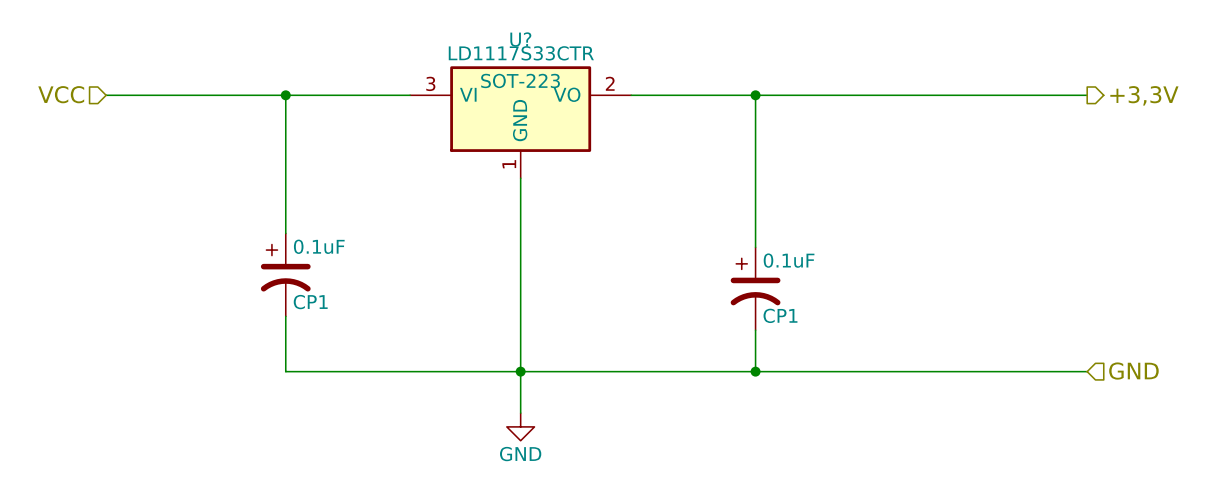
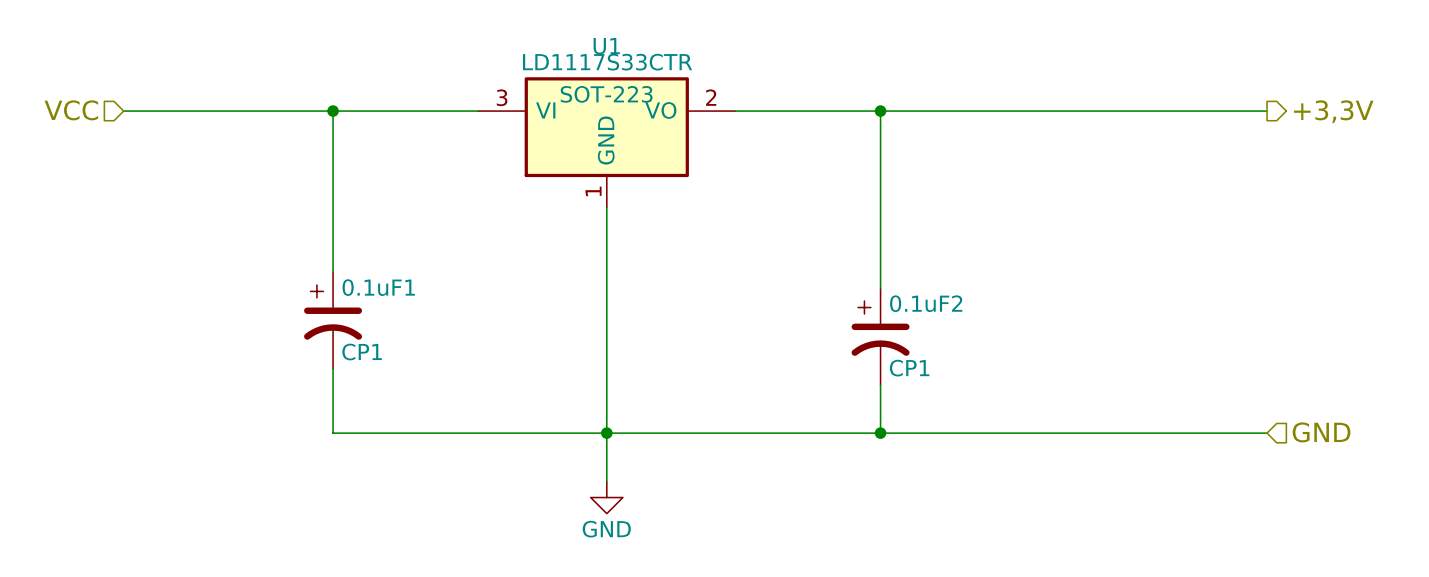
U? name: U? (520, 39) -> U1 (606, 46)
0.1uF name: 0.1uF (319, 246) -> 0.1uF1 (378, 287)
0.1uF name: 0.1uF (789, 260) -> 0.1uF2 (926, 303)

